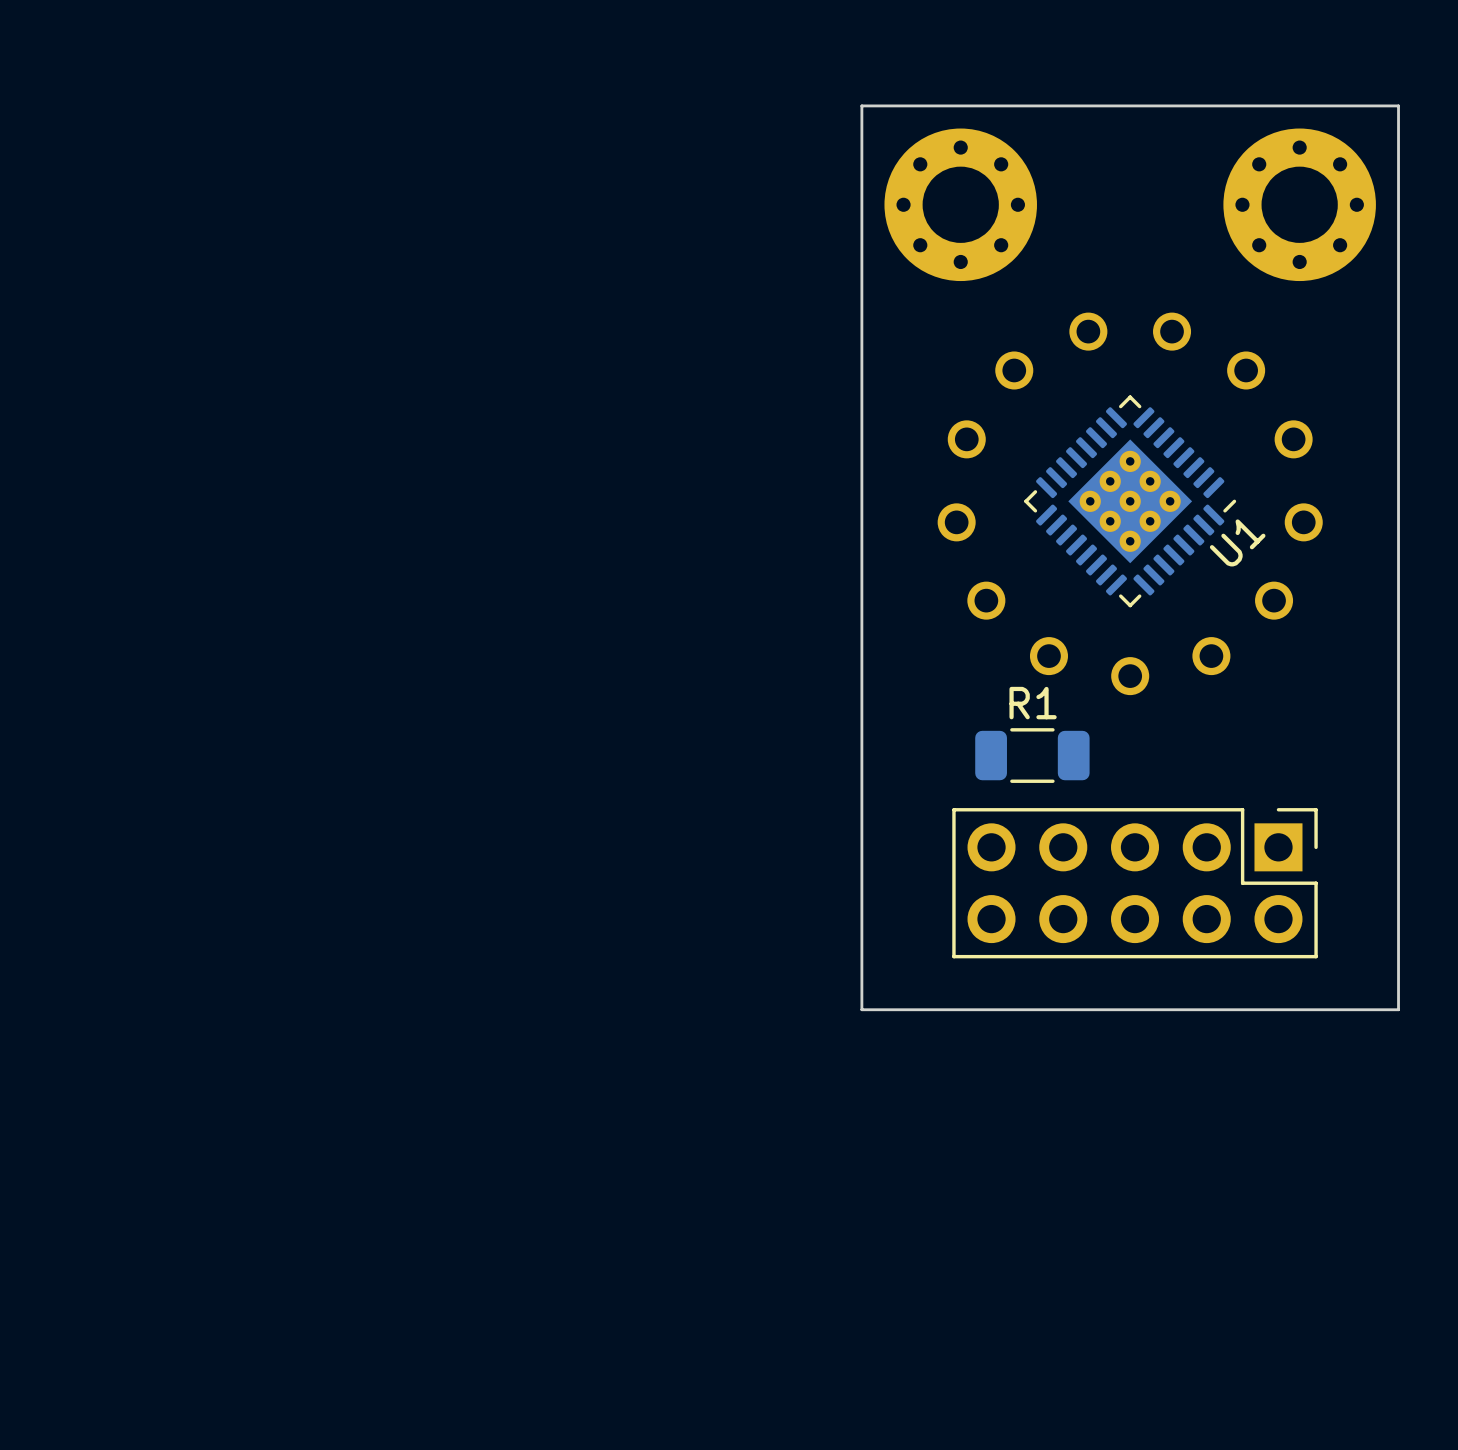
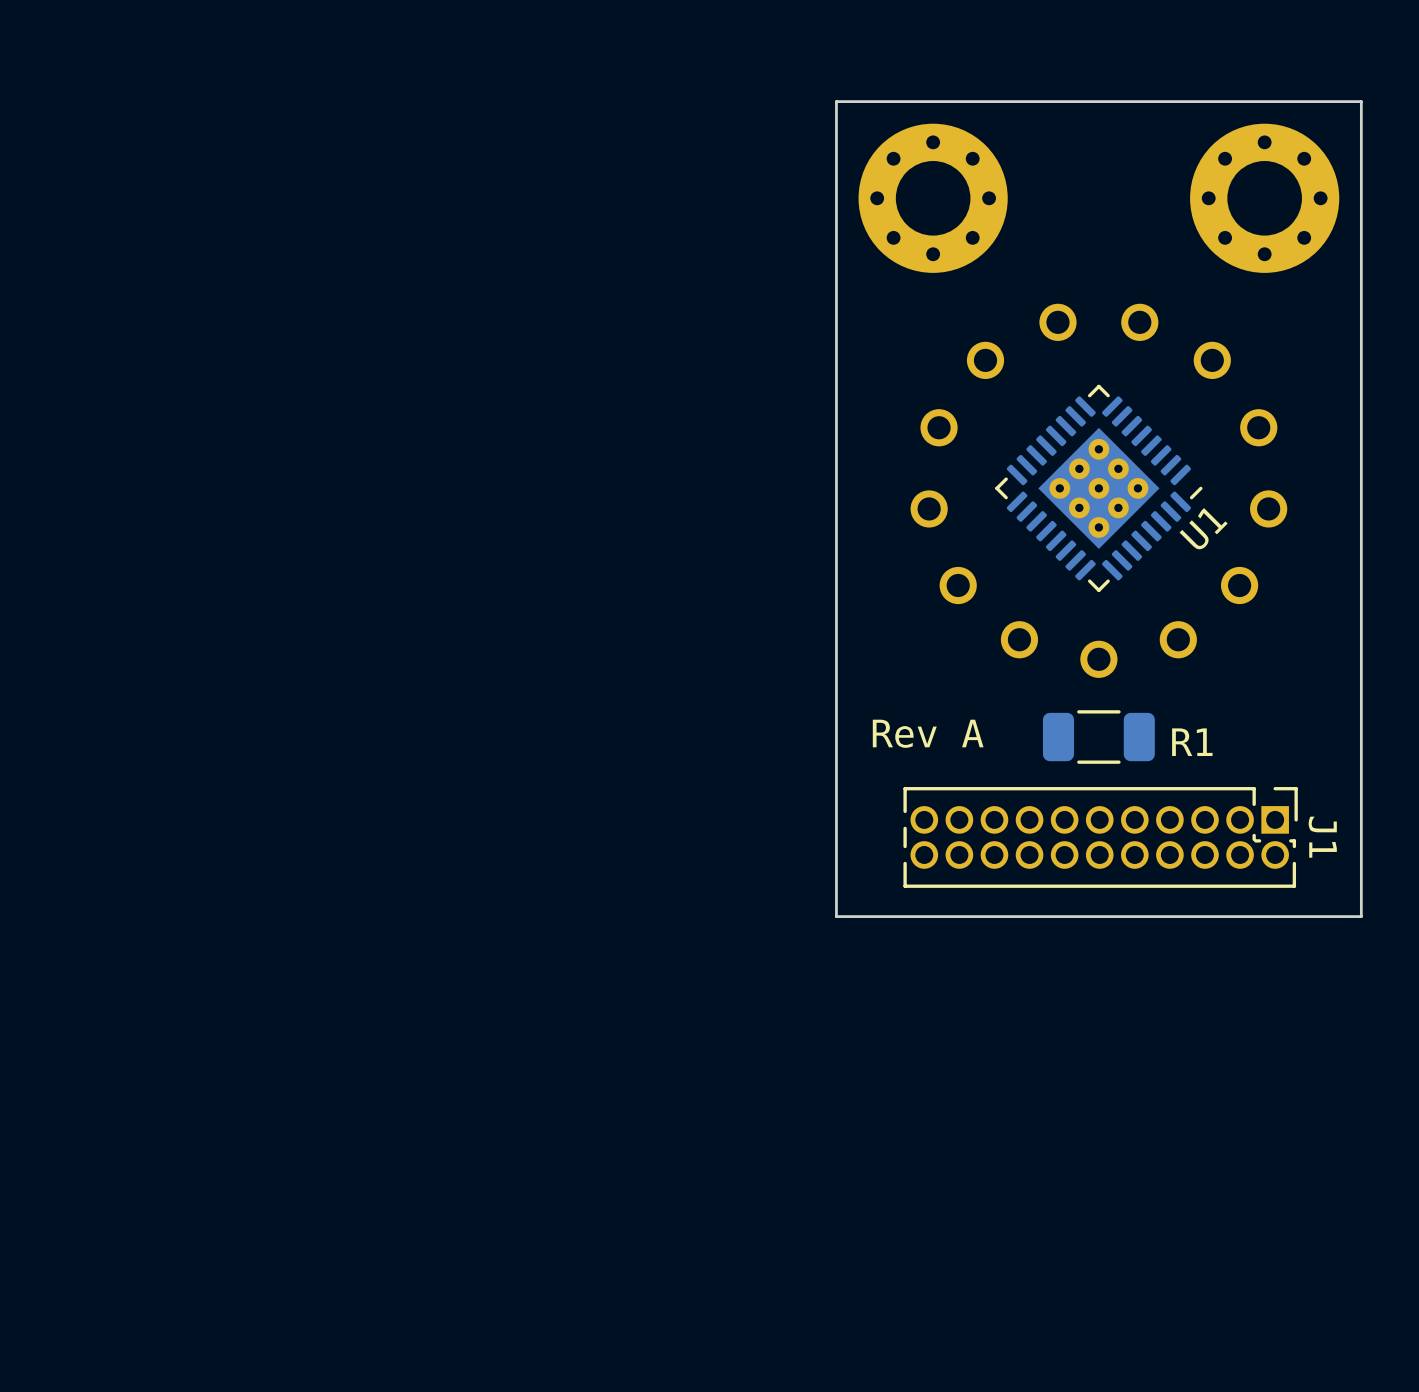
R1 name position: R1 (1033, 703) -> R1 (1192, 742)
text: none -> Rev A (928, 733)
R1 position: (1032, 755) -> (1098, 737)
J1: none -> (1100, 837)
part: (1135, 883) -> none
board edge: (1398, 939) (1398, 1009) (861, 1009) (861, 939) -> (1361, 916) (836, 916)

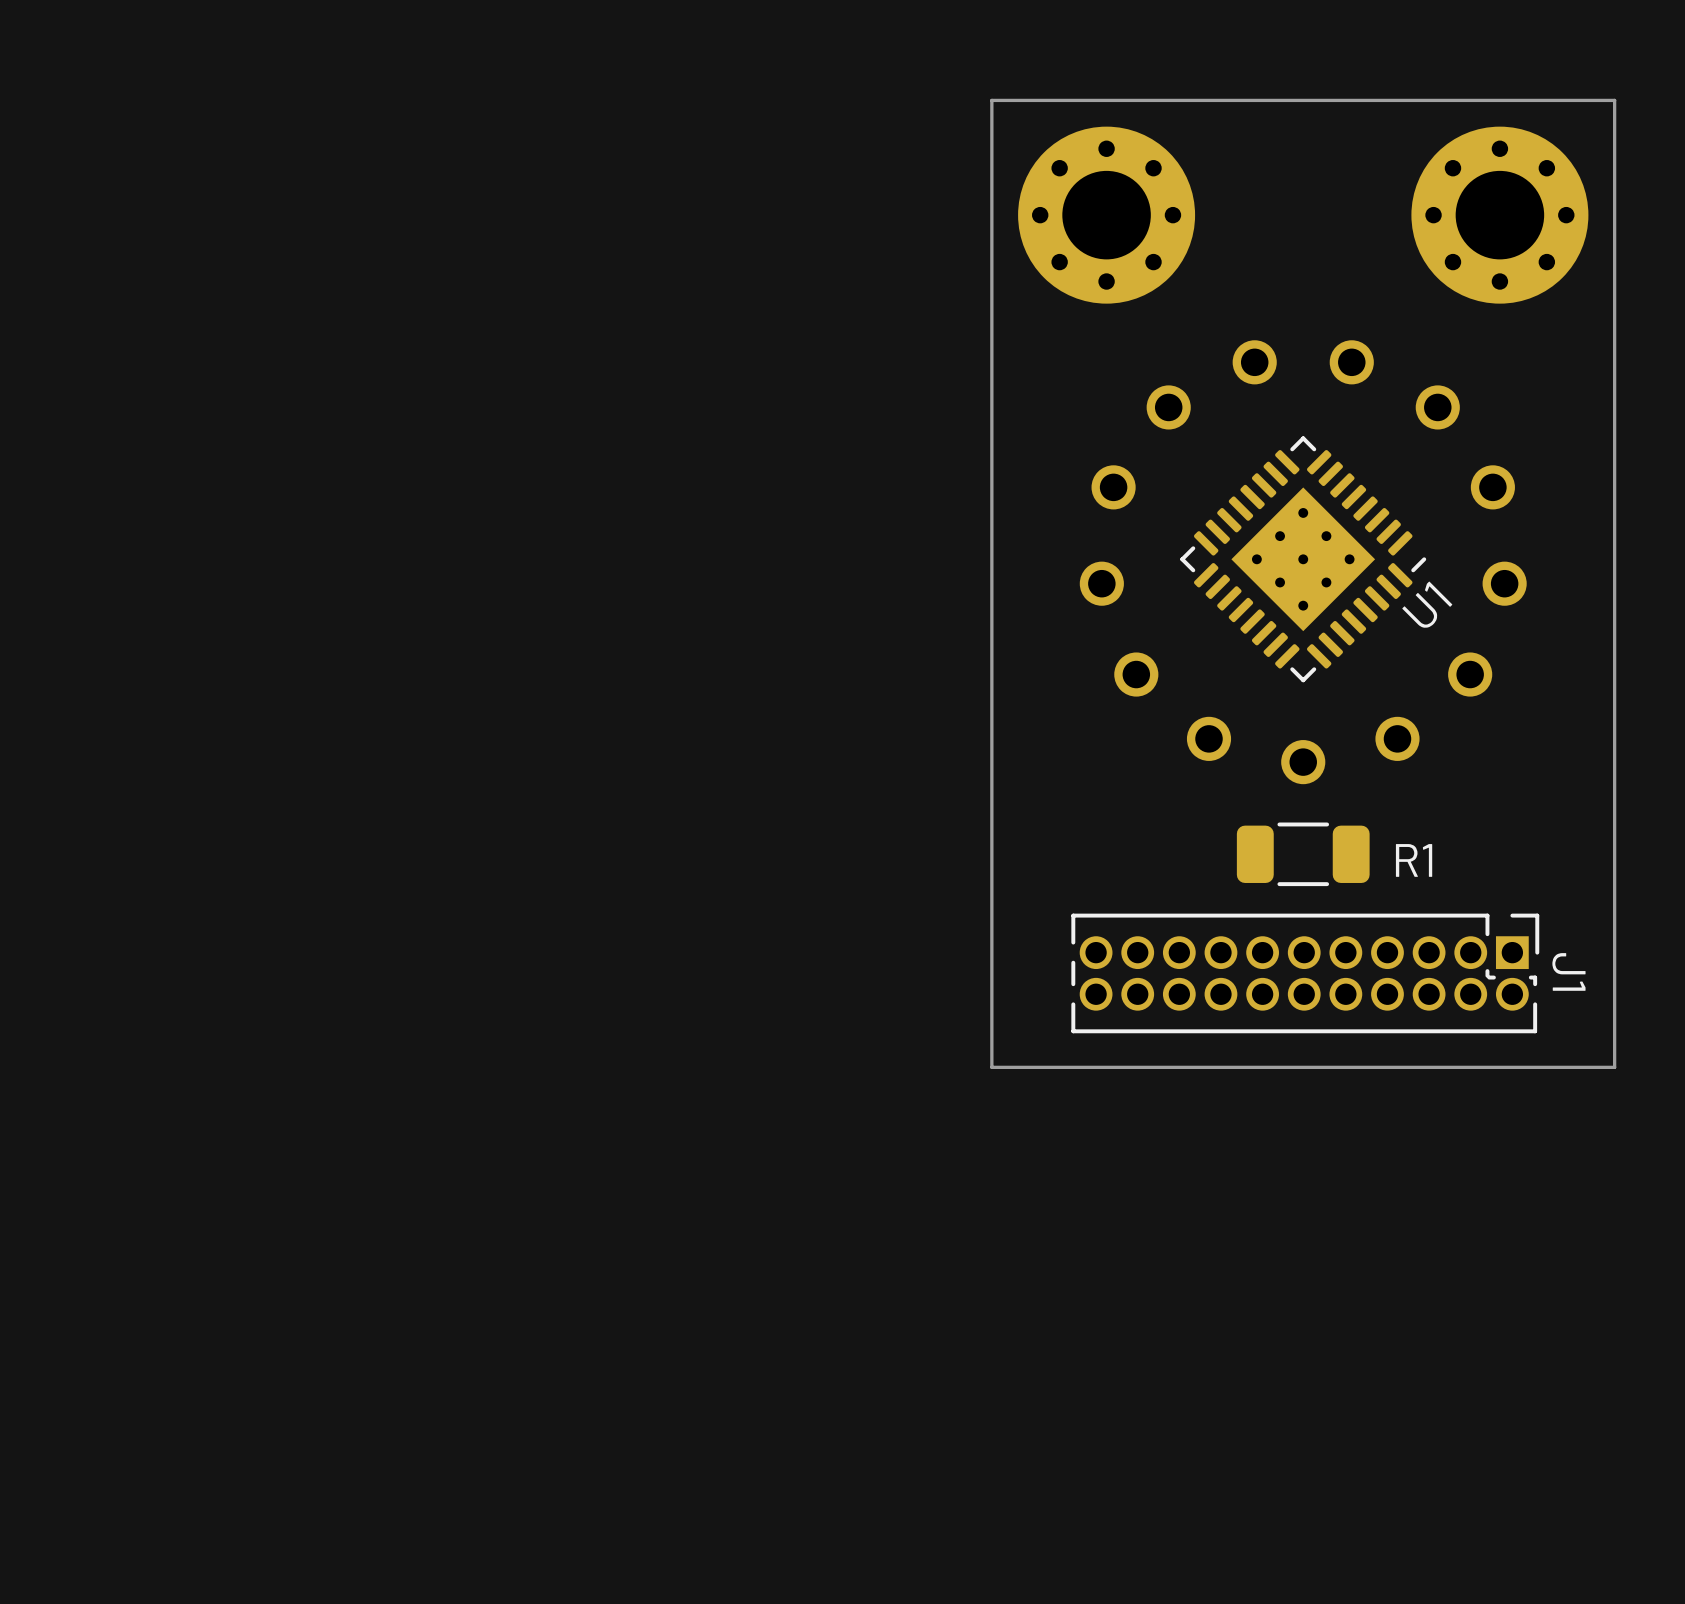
text: Rev A (928, 733) -> none

